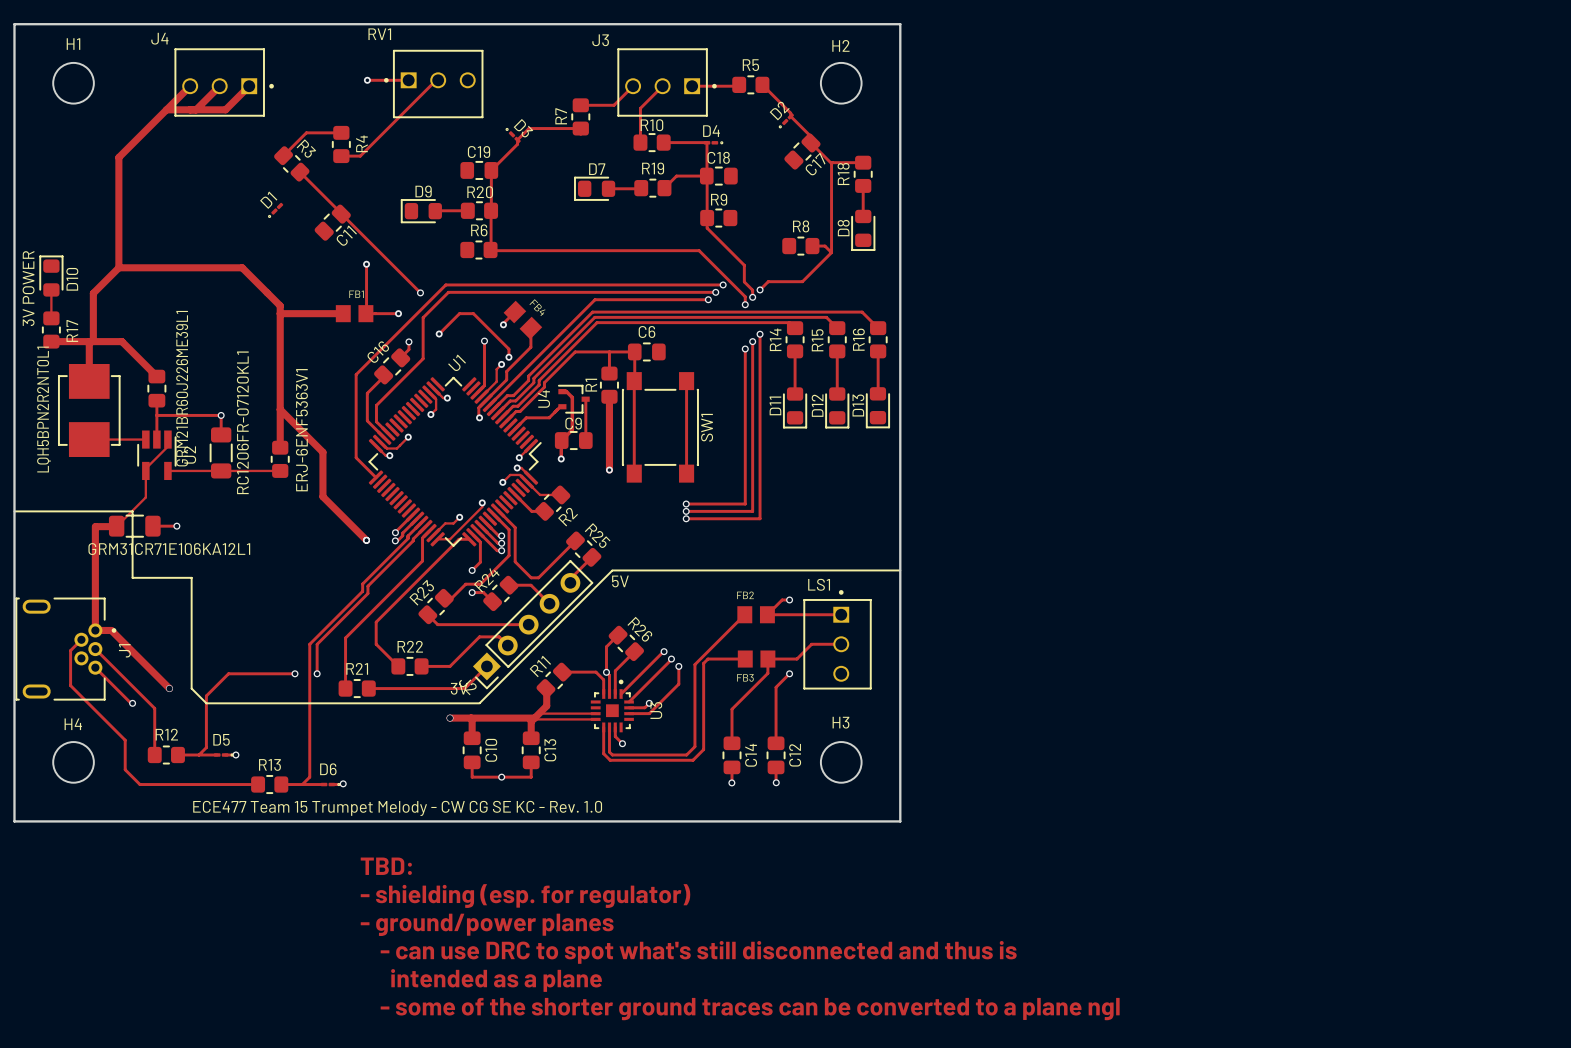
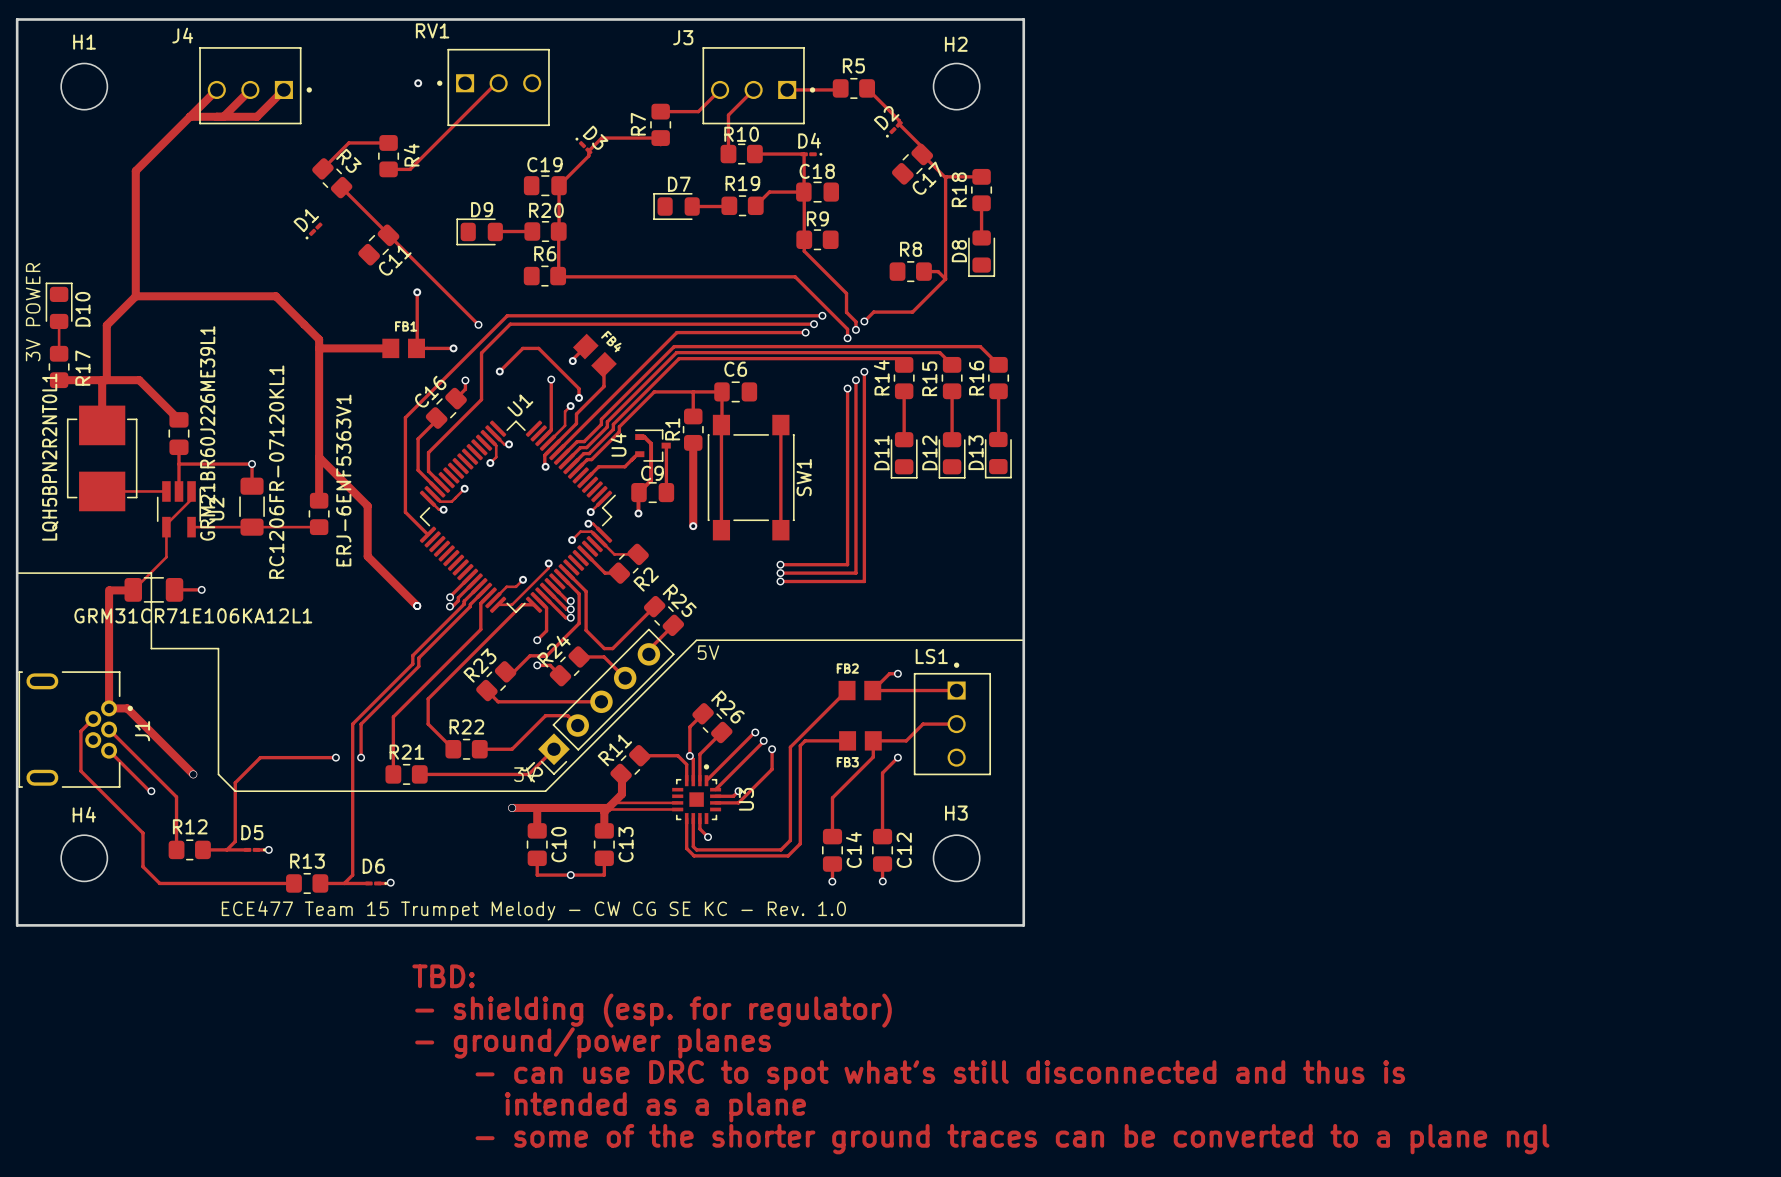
track: (367, 80) (408, 80) -> none

